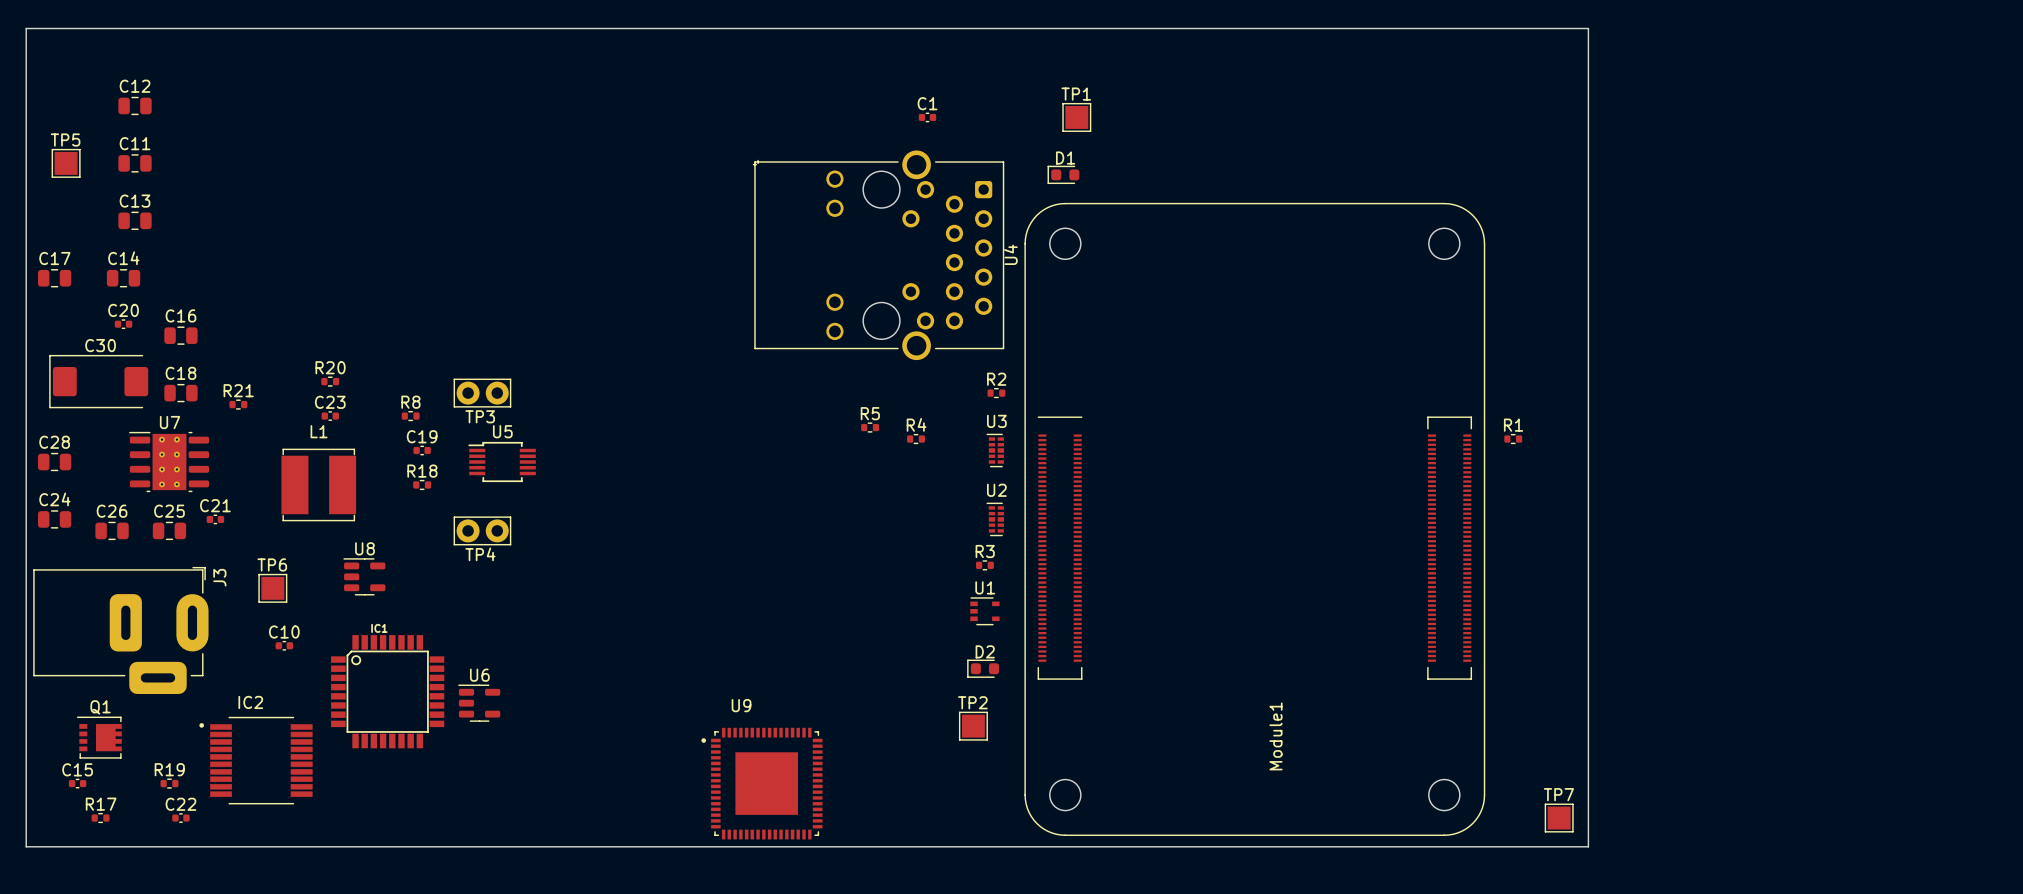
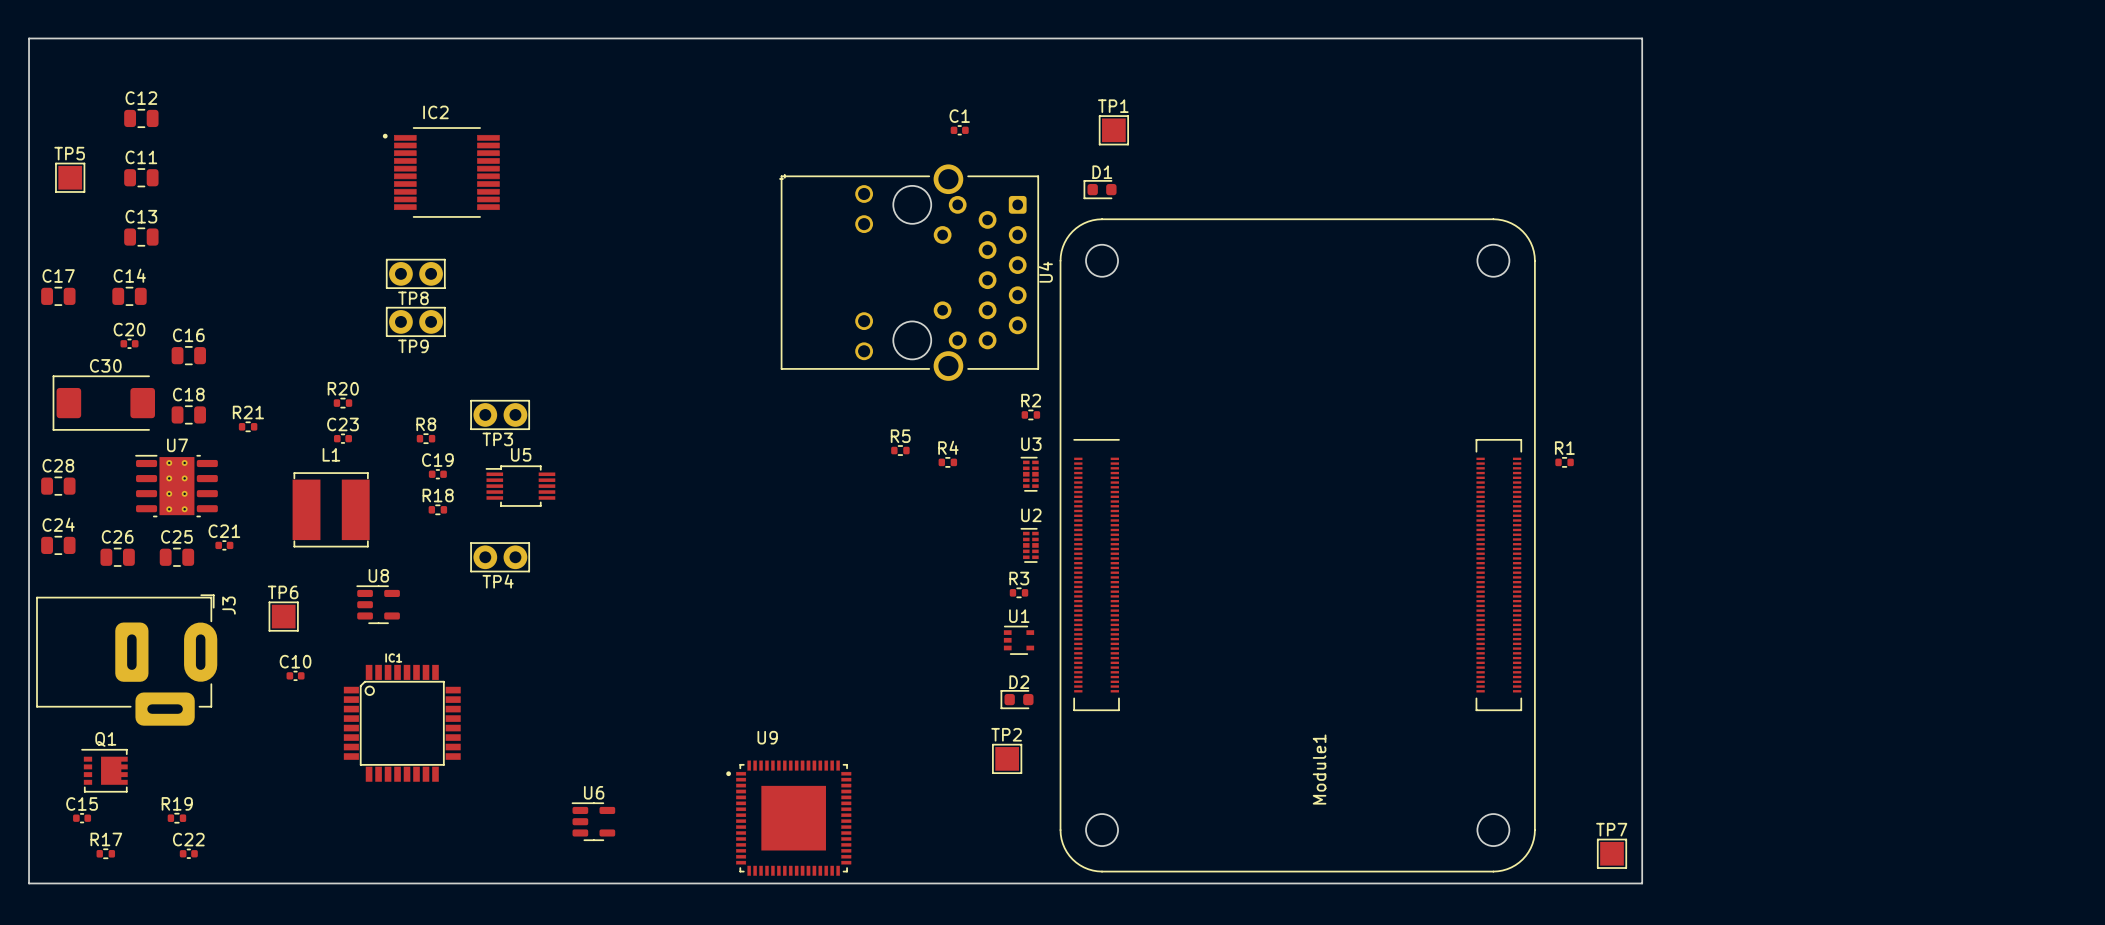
TP8: none -> (415, 273)
TP9: none -> (415, 321)
U6 position: (479, 703) -> (593, 821)
IC2 position: (255, 760) -> (441, 172)

